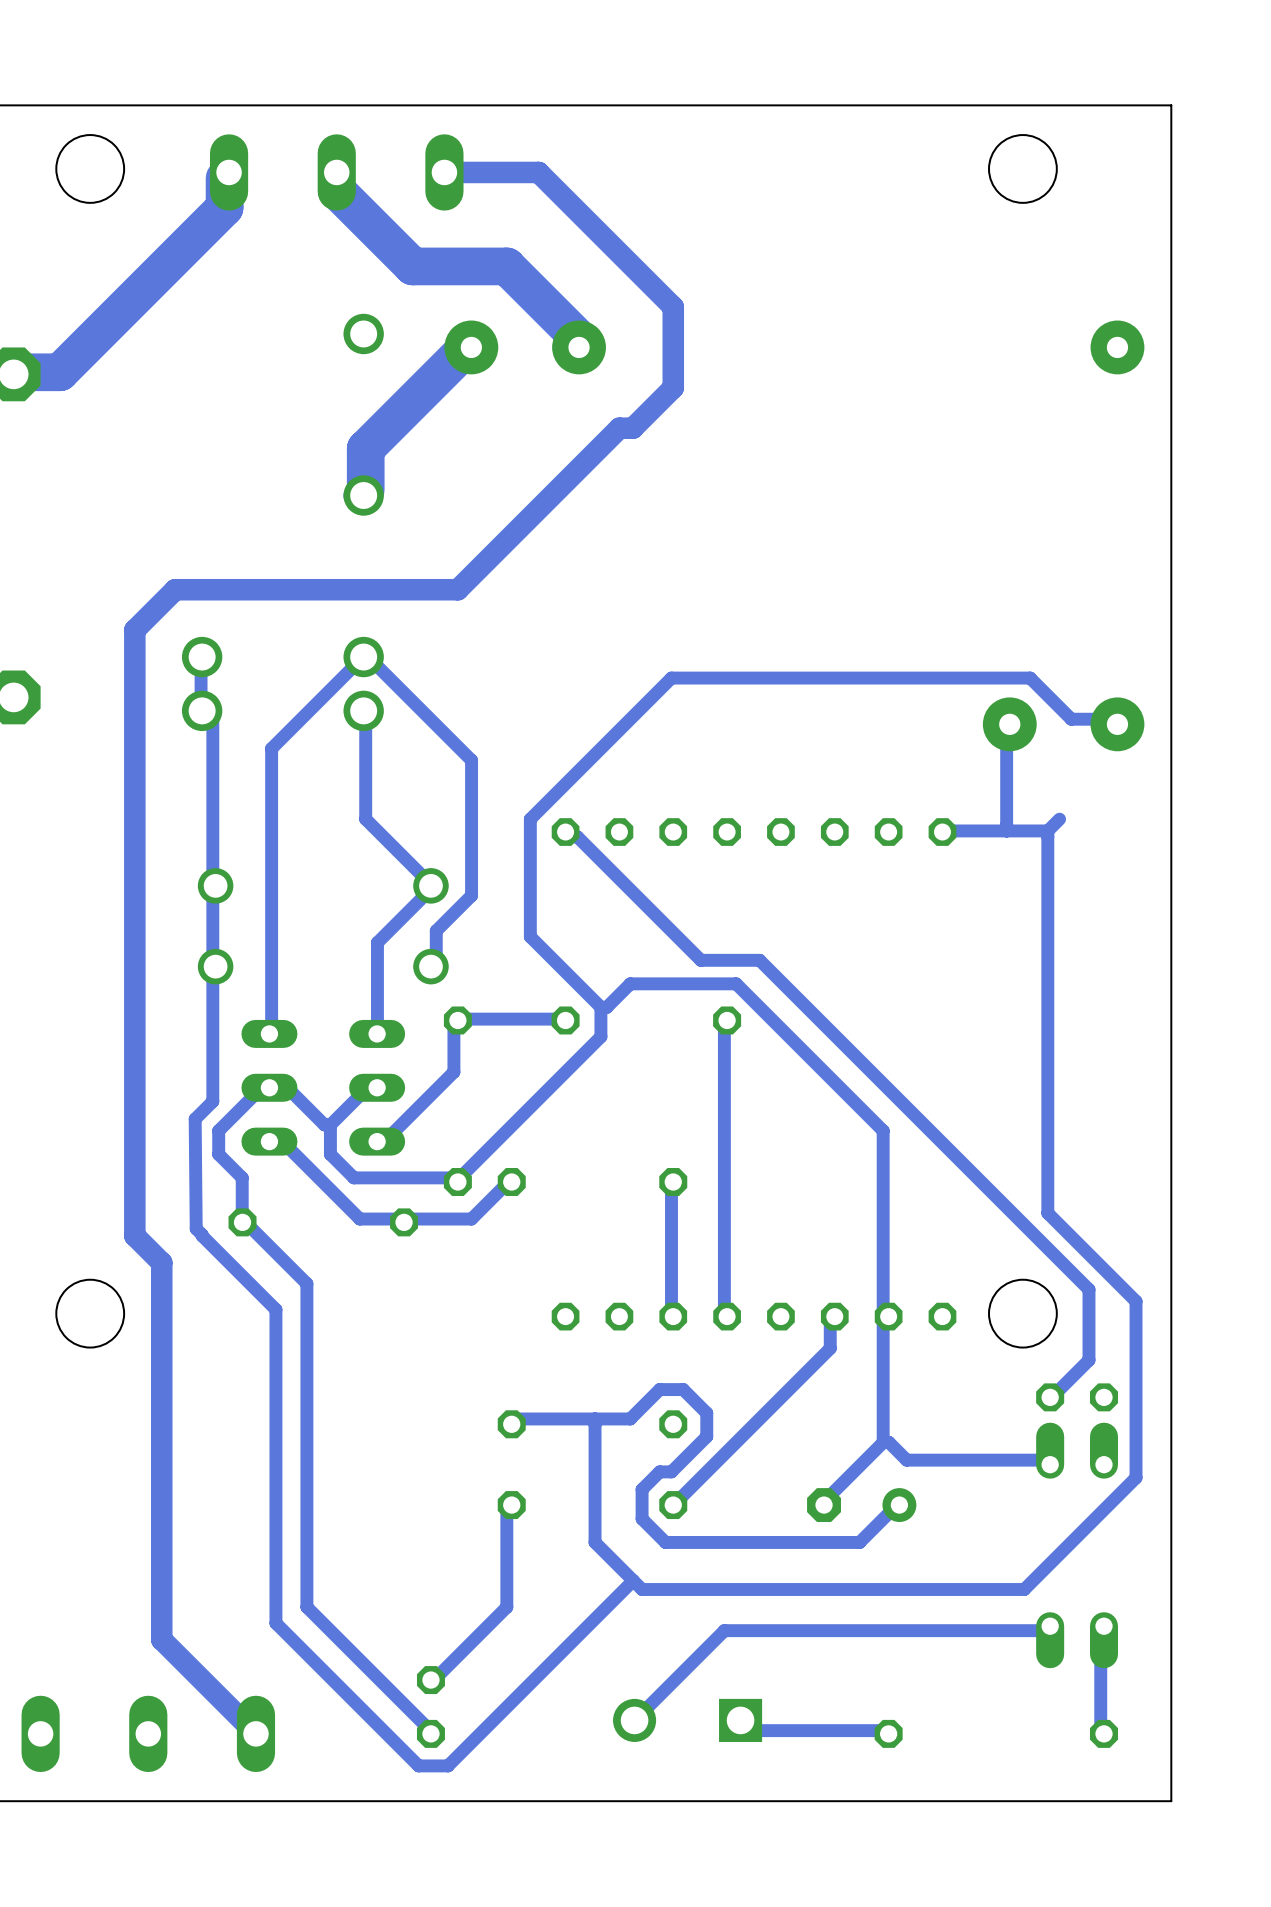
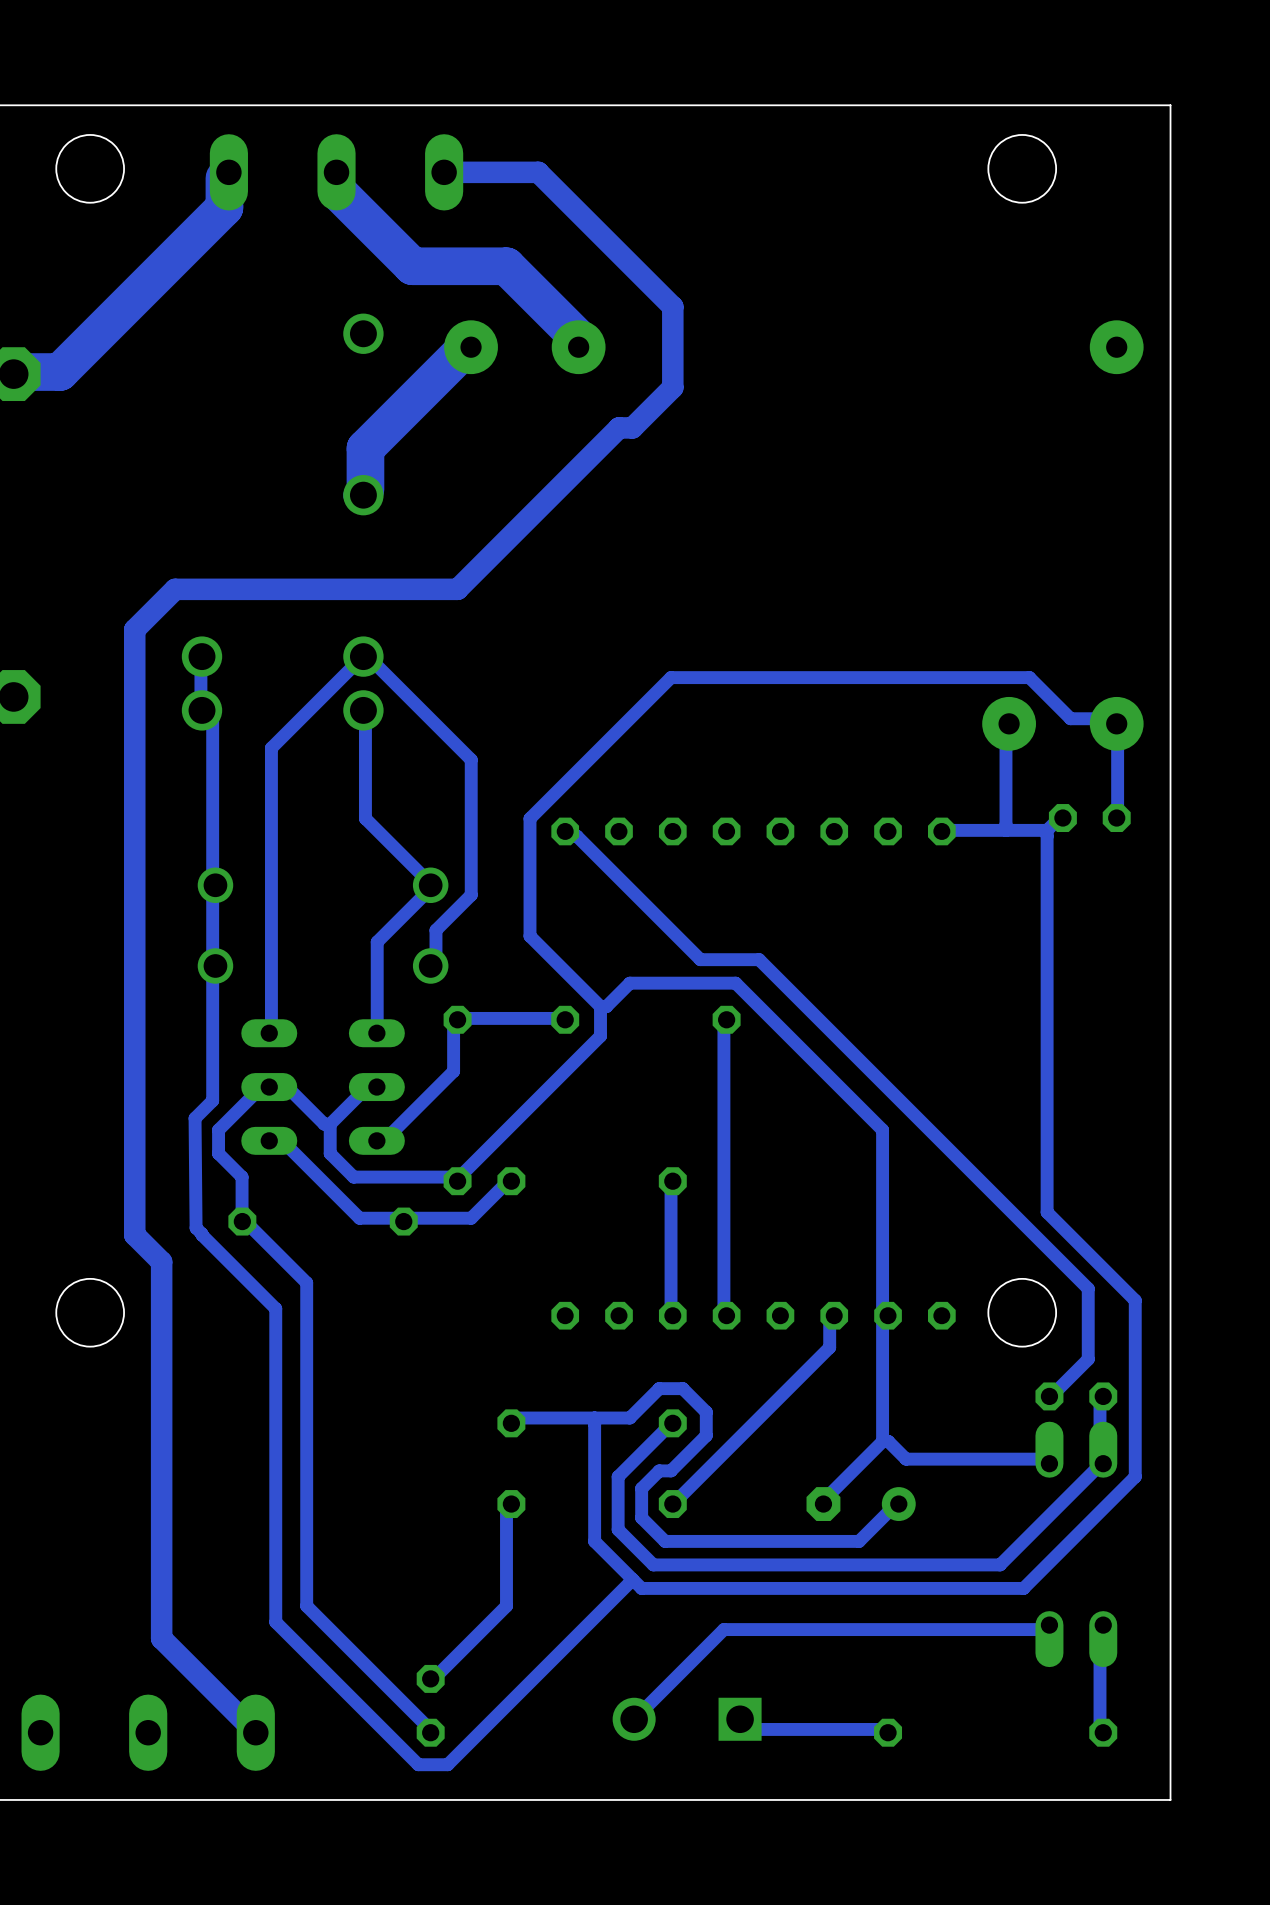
bottom track: none -> (1111, 718) (1117, 724) (1116, 818)
part: none -> (1089, 818)
bottom track: none -> (1103, 1396) (1100, 1400) (1100, 1459) (1103, 1463) (1000, 1564) (653, 1564) (618, 1529) (618, 1476) (672, 1423)

